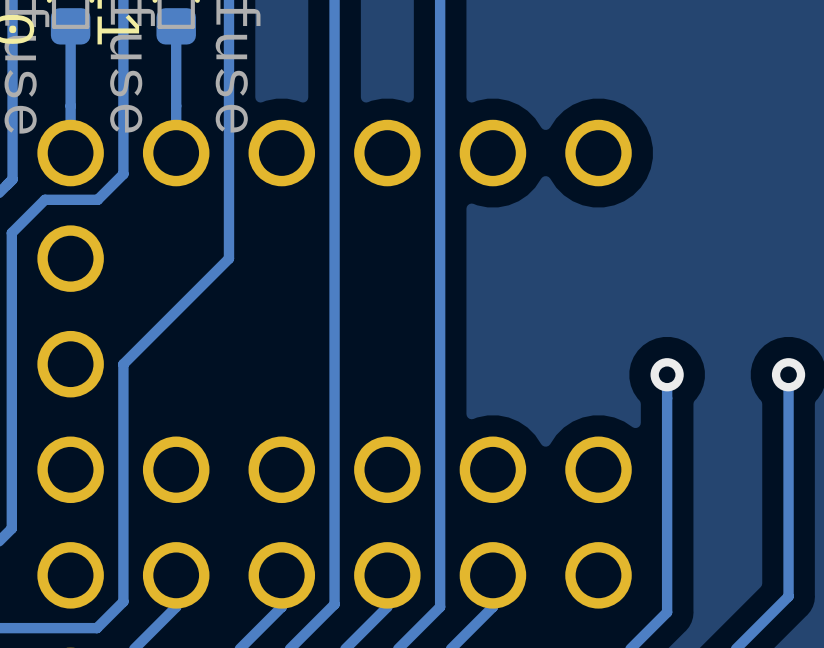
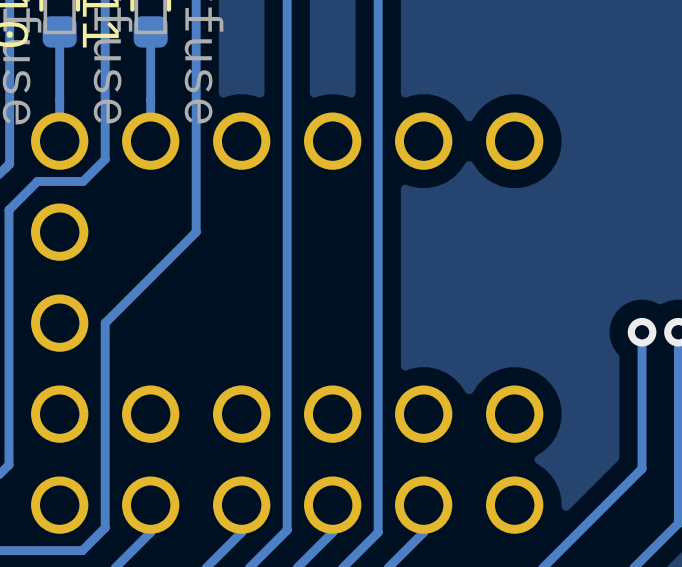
track: (667, 374) (667, 612) -> (642, 332) (642, 468) (573, 536)
via position: (667, 374) -> (642, 332)

